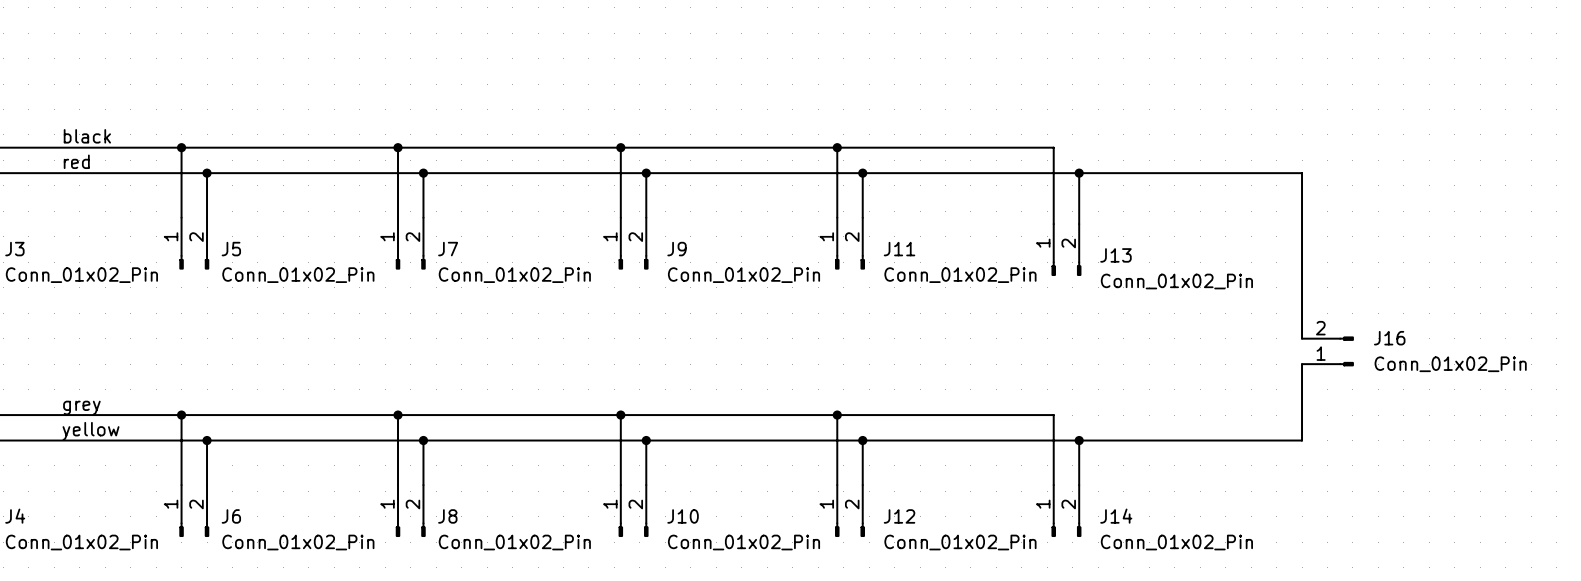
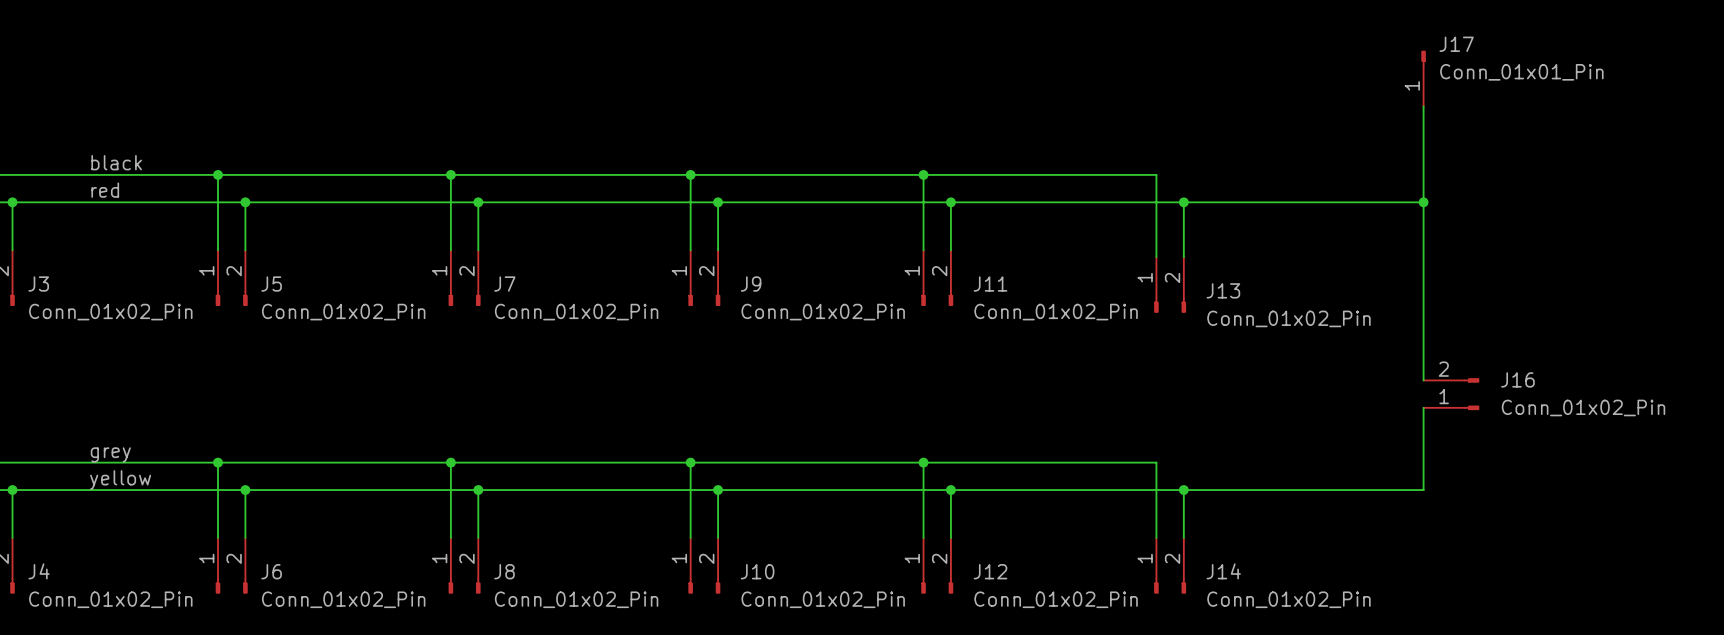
J17: none -> Conn_01x01_Pin (1423, 78)
wire: none -> (1423, 106) (1423, 202)
junction: none -> (1423, 202)

